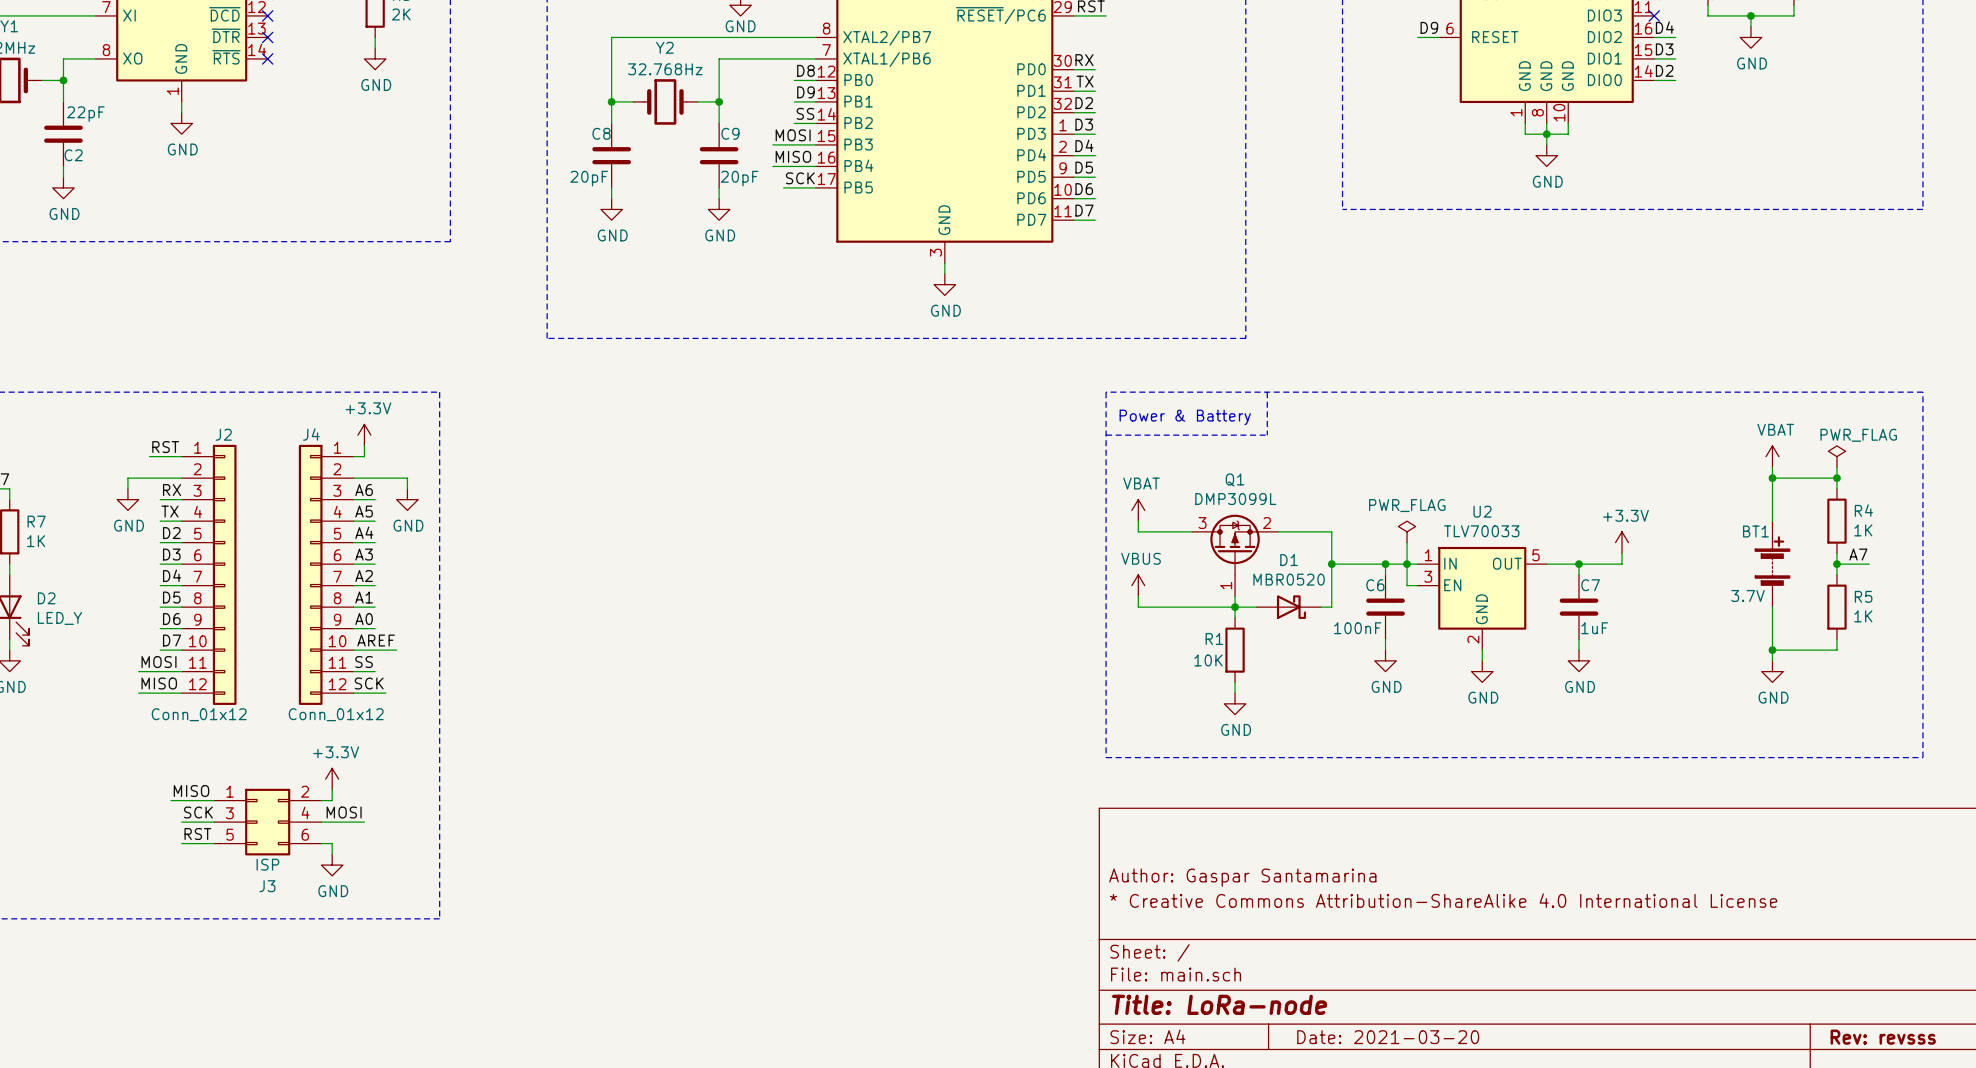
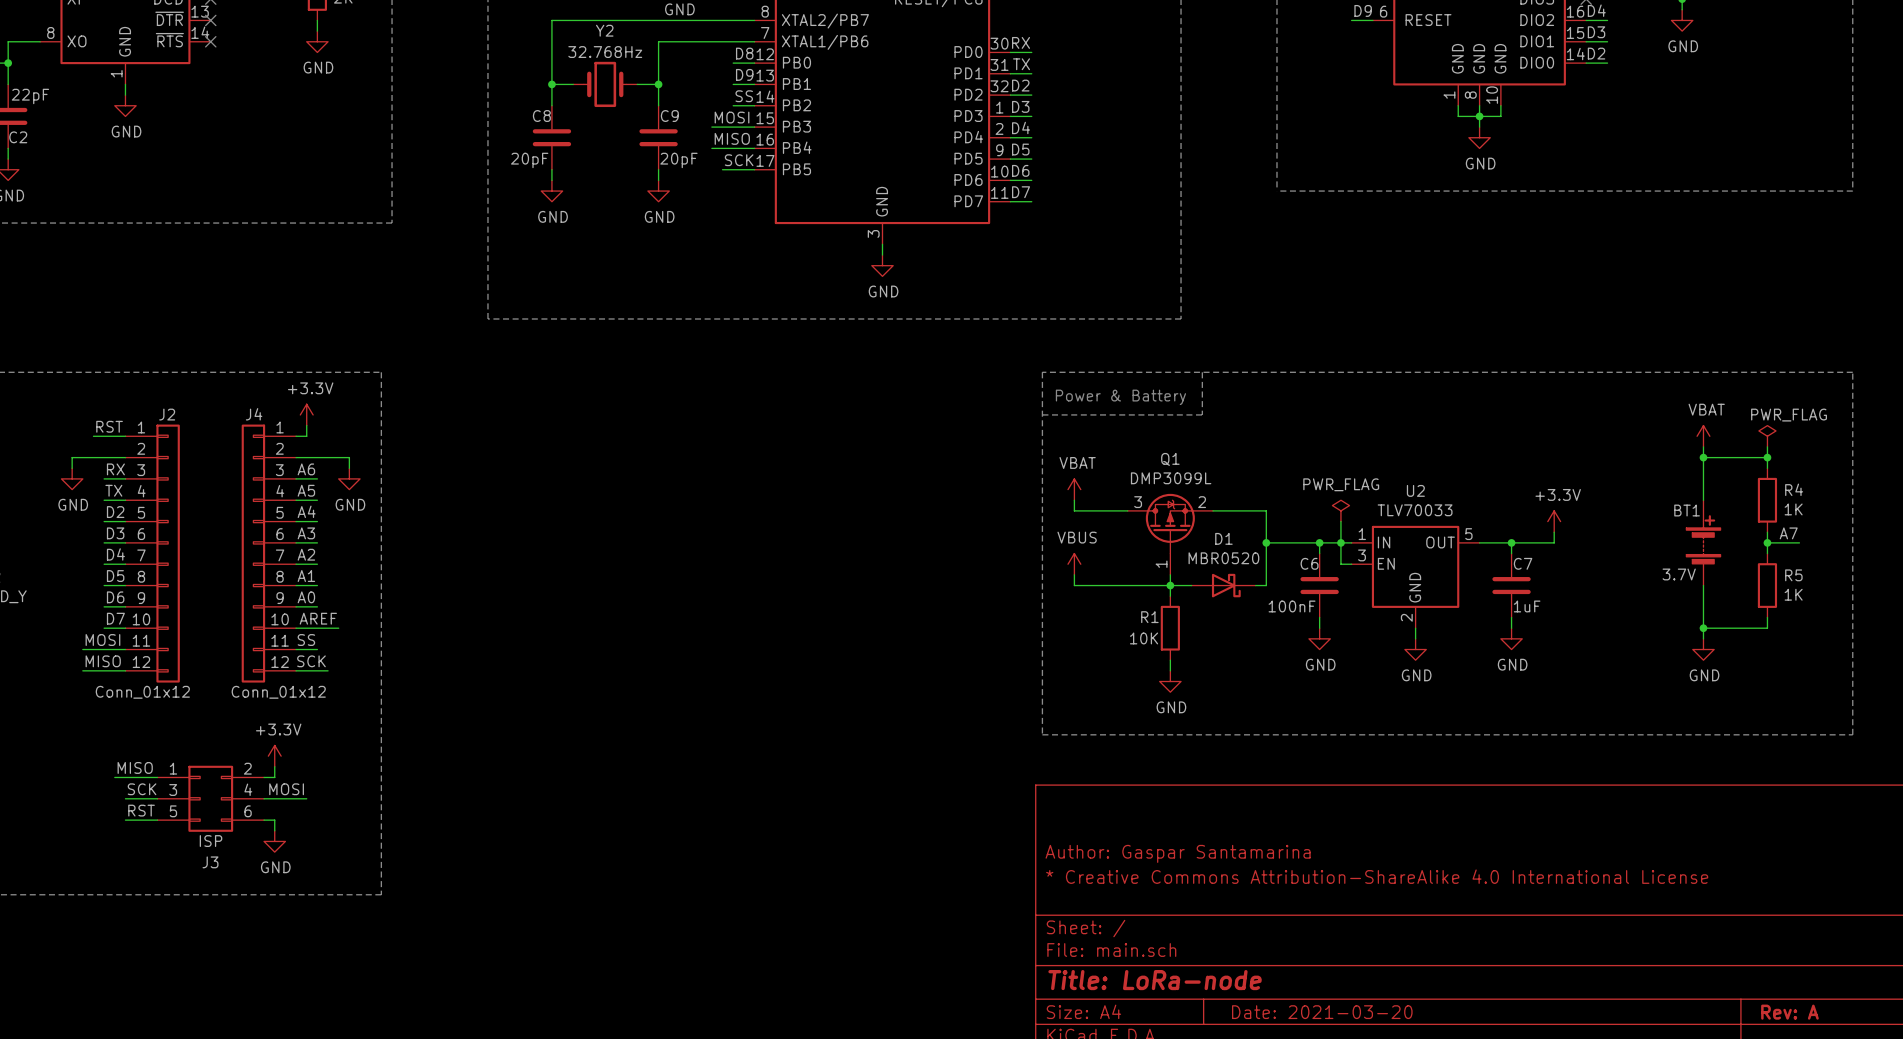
title block: Rev: revsss (1883, 1037) -> Rev: A (1789, 1012)

